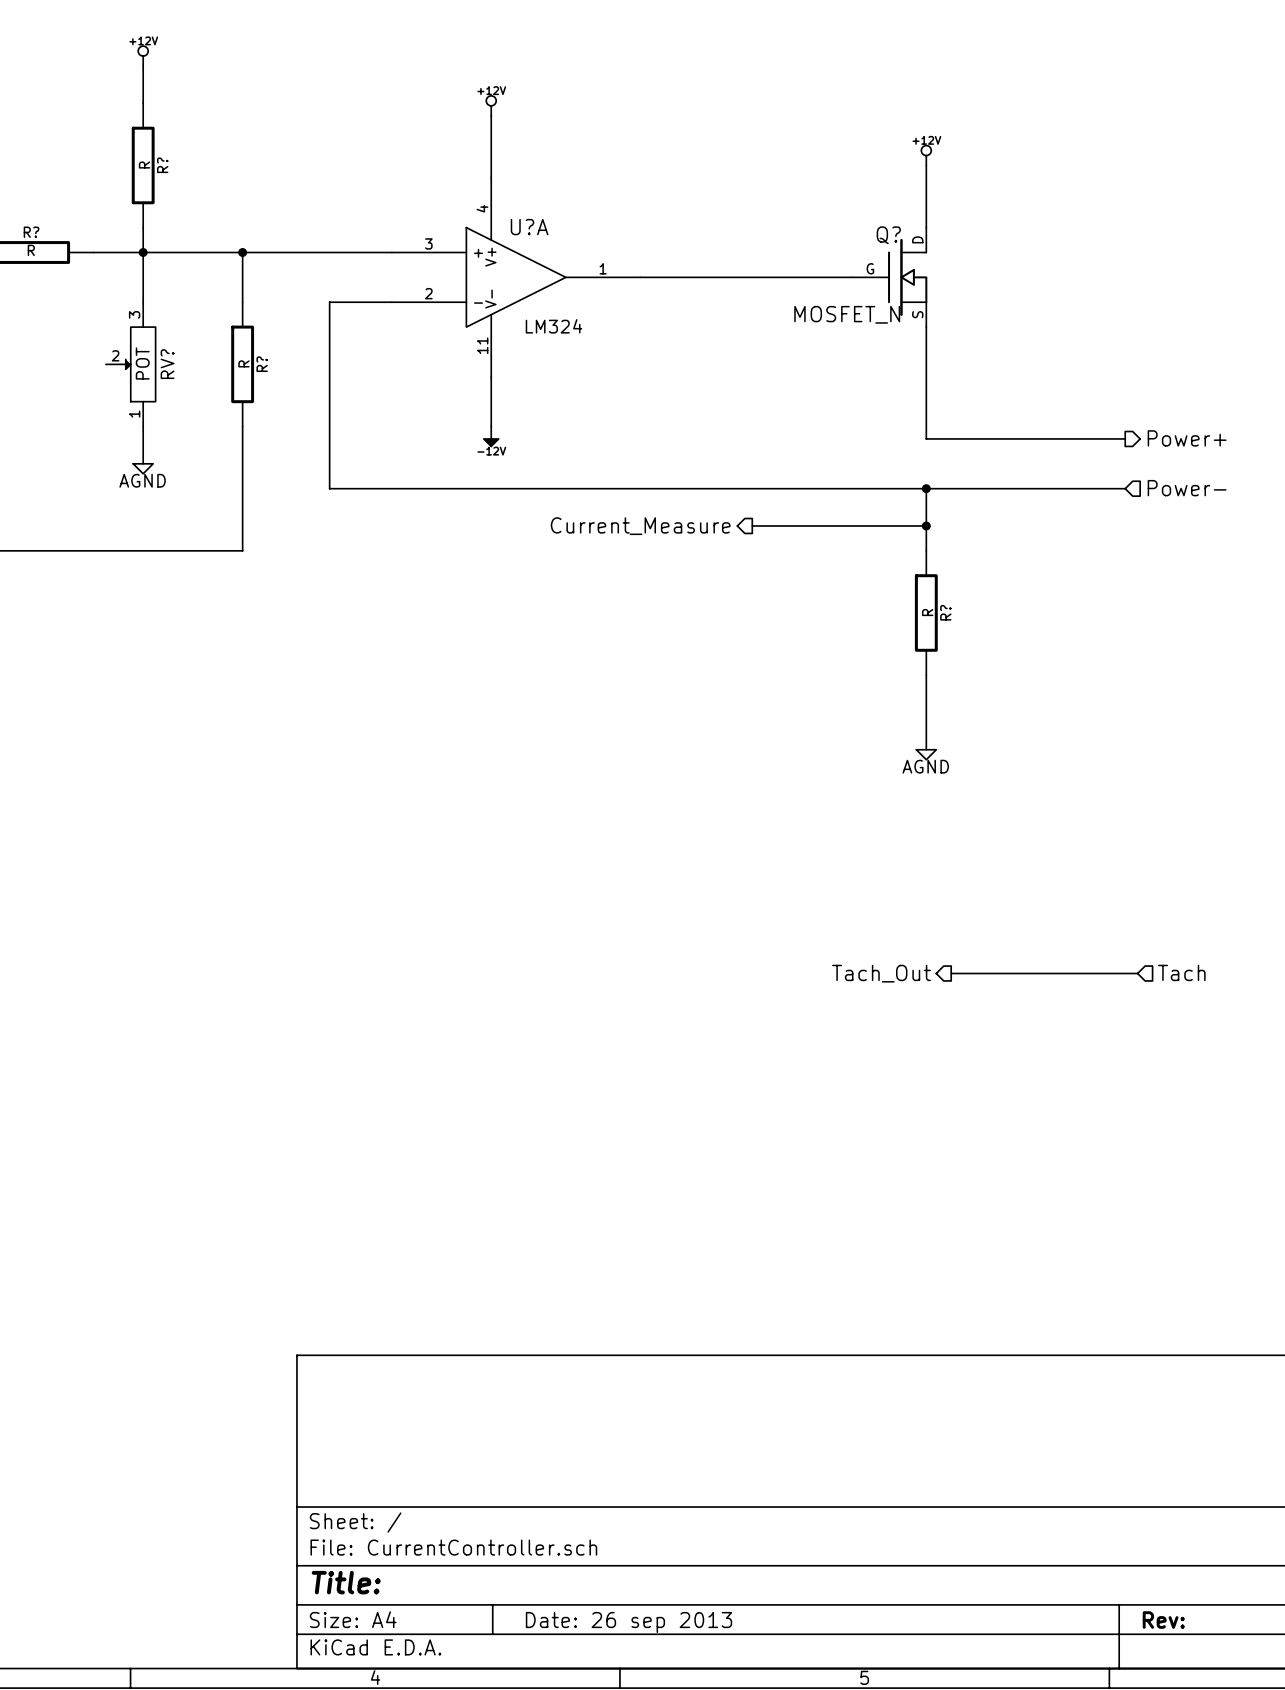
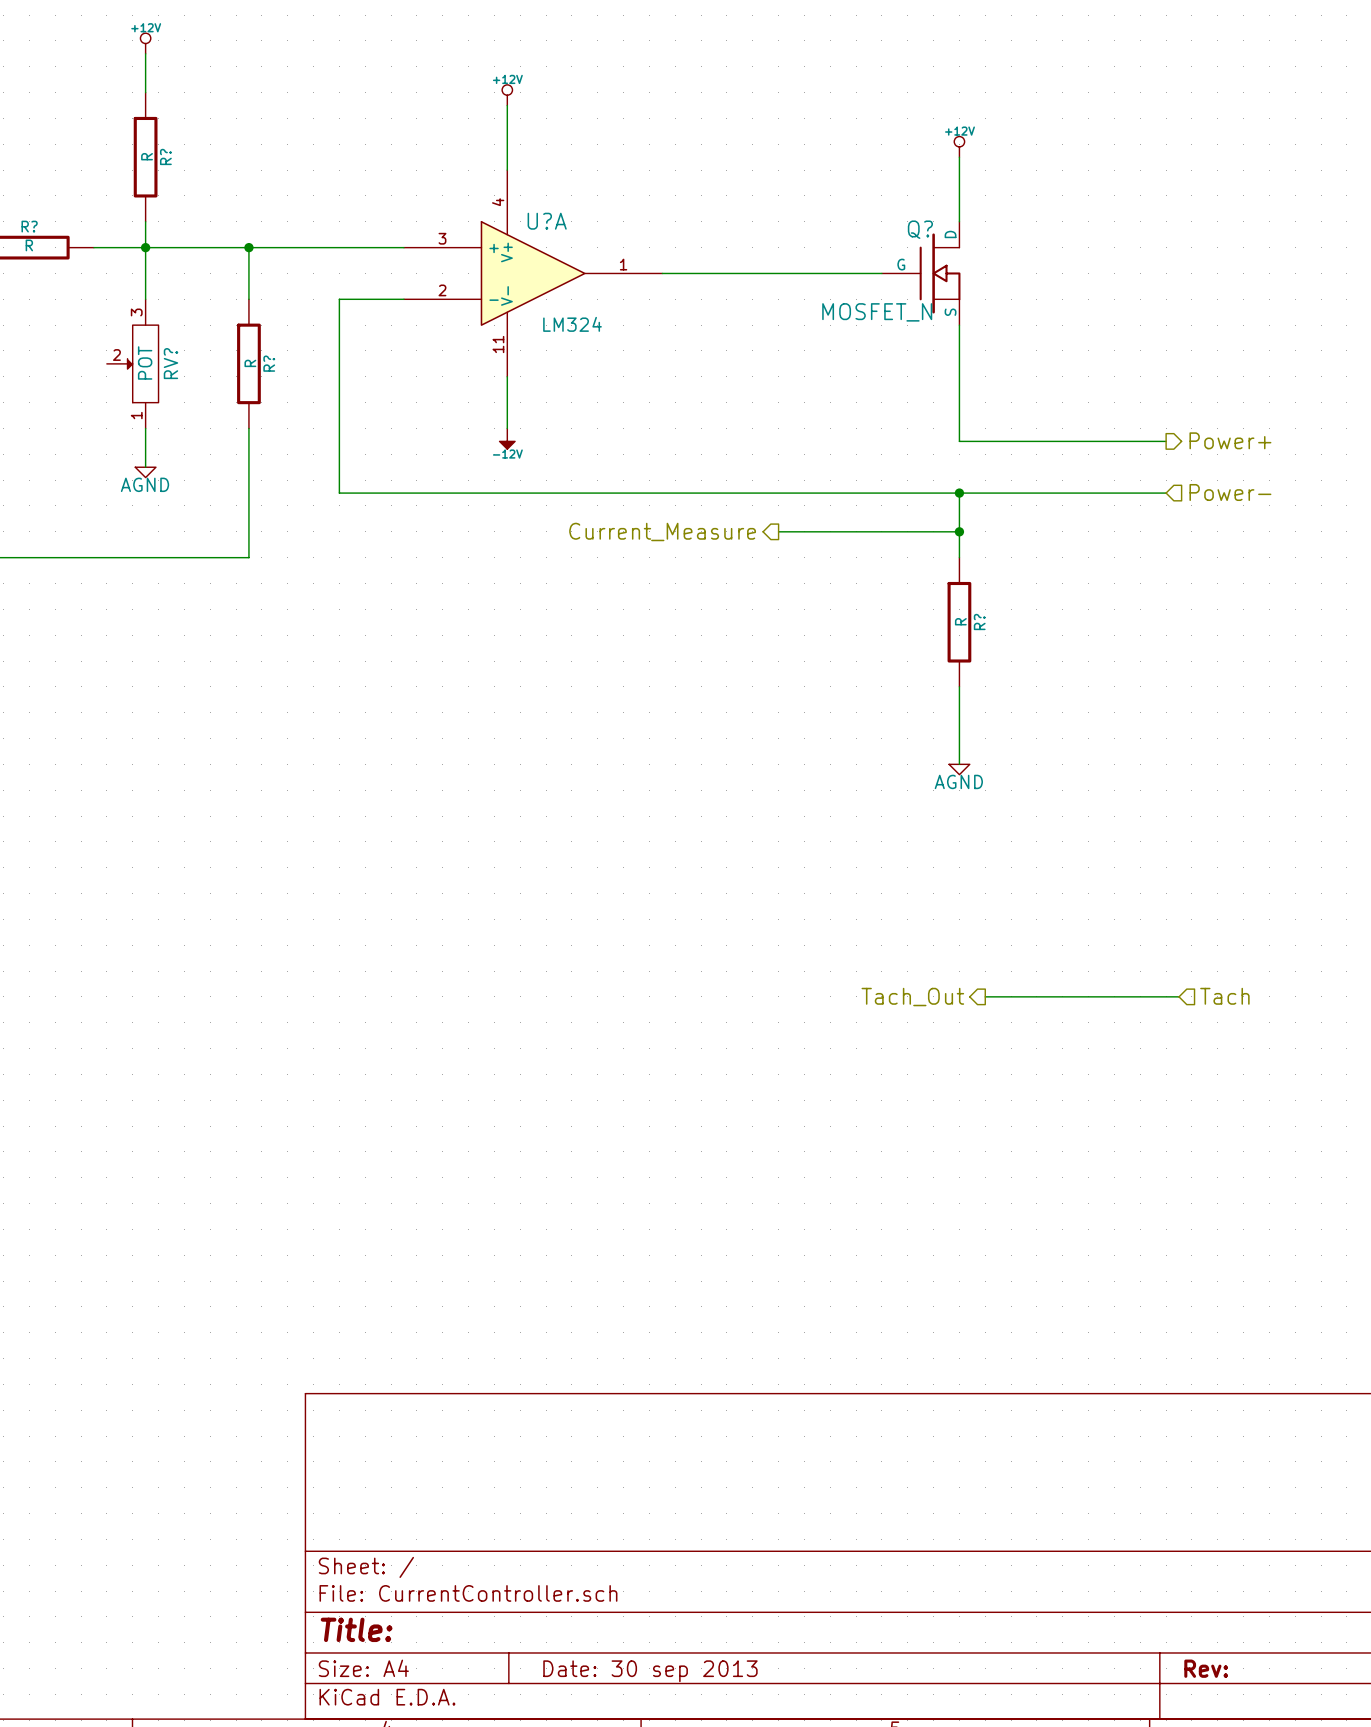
title block: Date: 26 sep 2013 (629, 1622) -> Date: 30 sep 2013 (650, 1671)

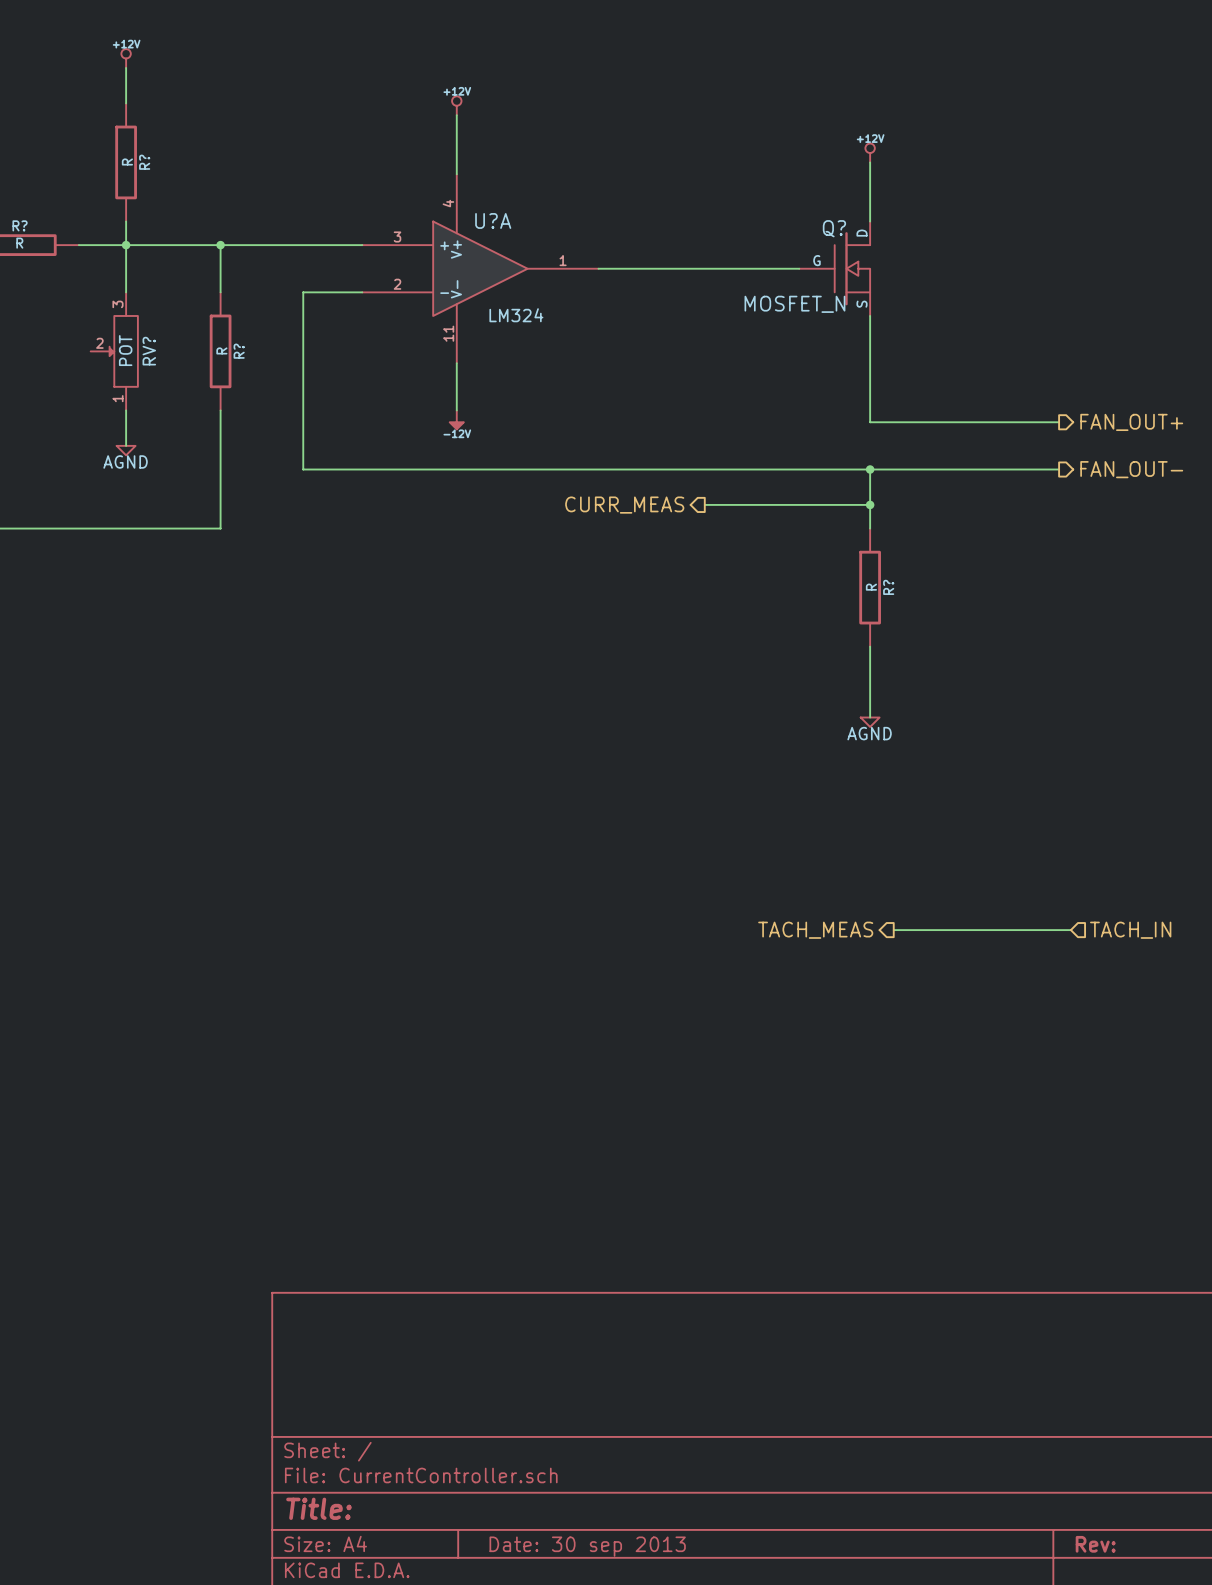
hierarchical label: Power+ (1230, 440) -> FAN_OUT+ (1131, 422)
hierarchical label shape: input (1230, 492) -> output (1131, 469)
hierarchical label: Power- (1230, 492) -> FAN_OUT- (1131, 469)
hierarchical label: Current_Measure (662, 531) -> CURR_MEAS (624, 505)
hierarchical label: Tach (1224, 996) -> TACH_IN (1130, 930)
hierarchical label: Tach_Out (912, 997) -> TACH_MEAS (815, 930)

